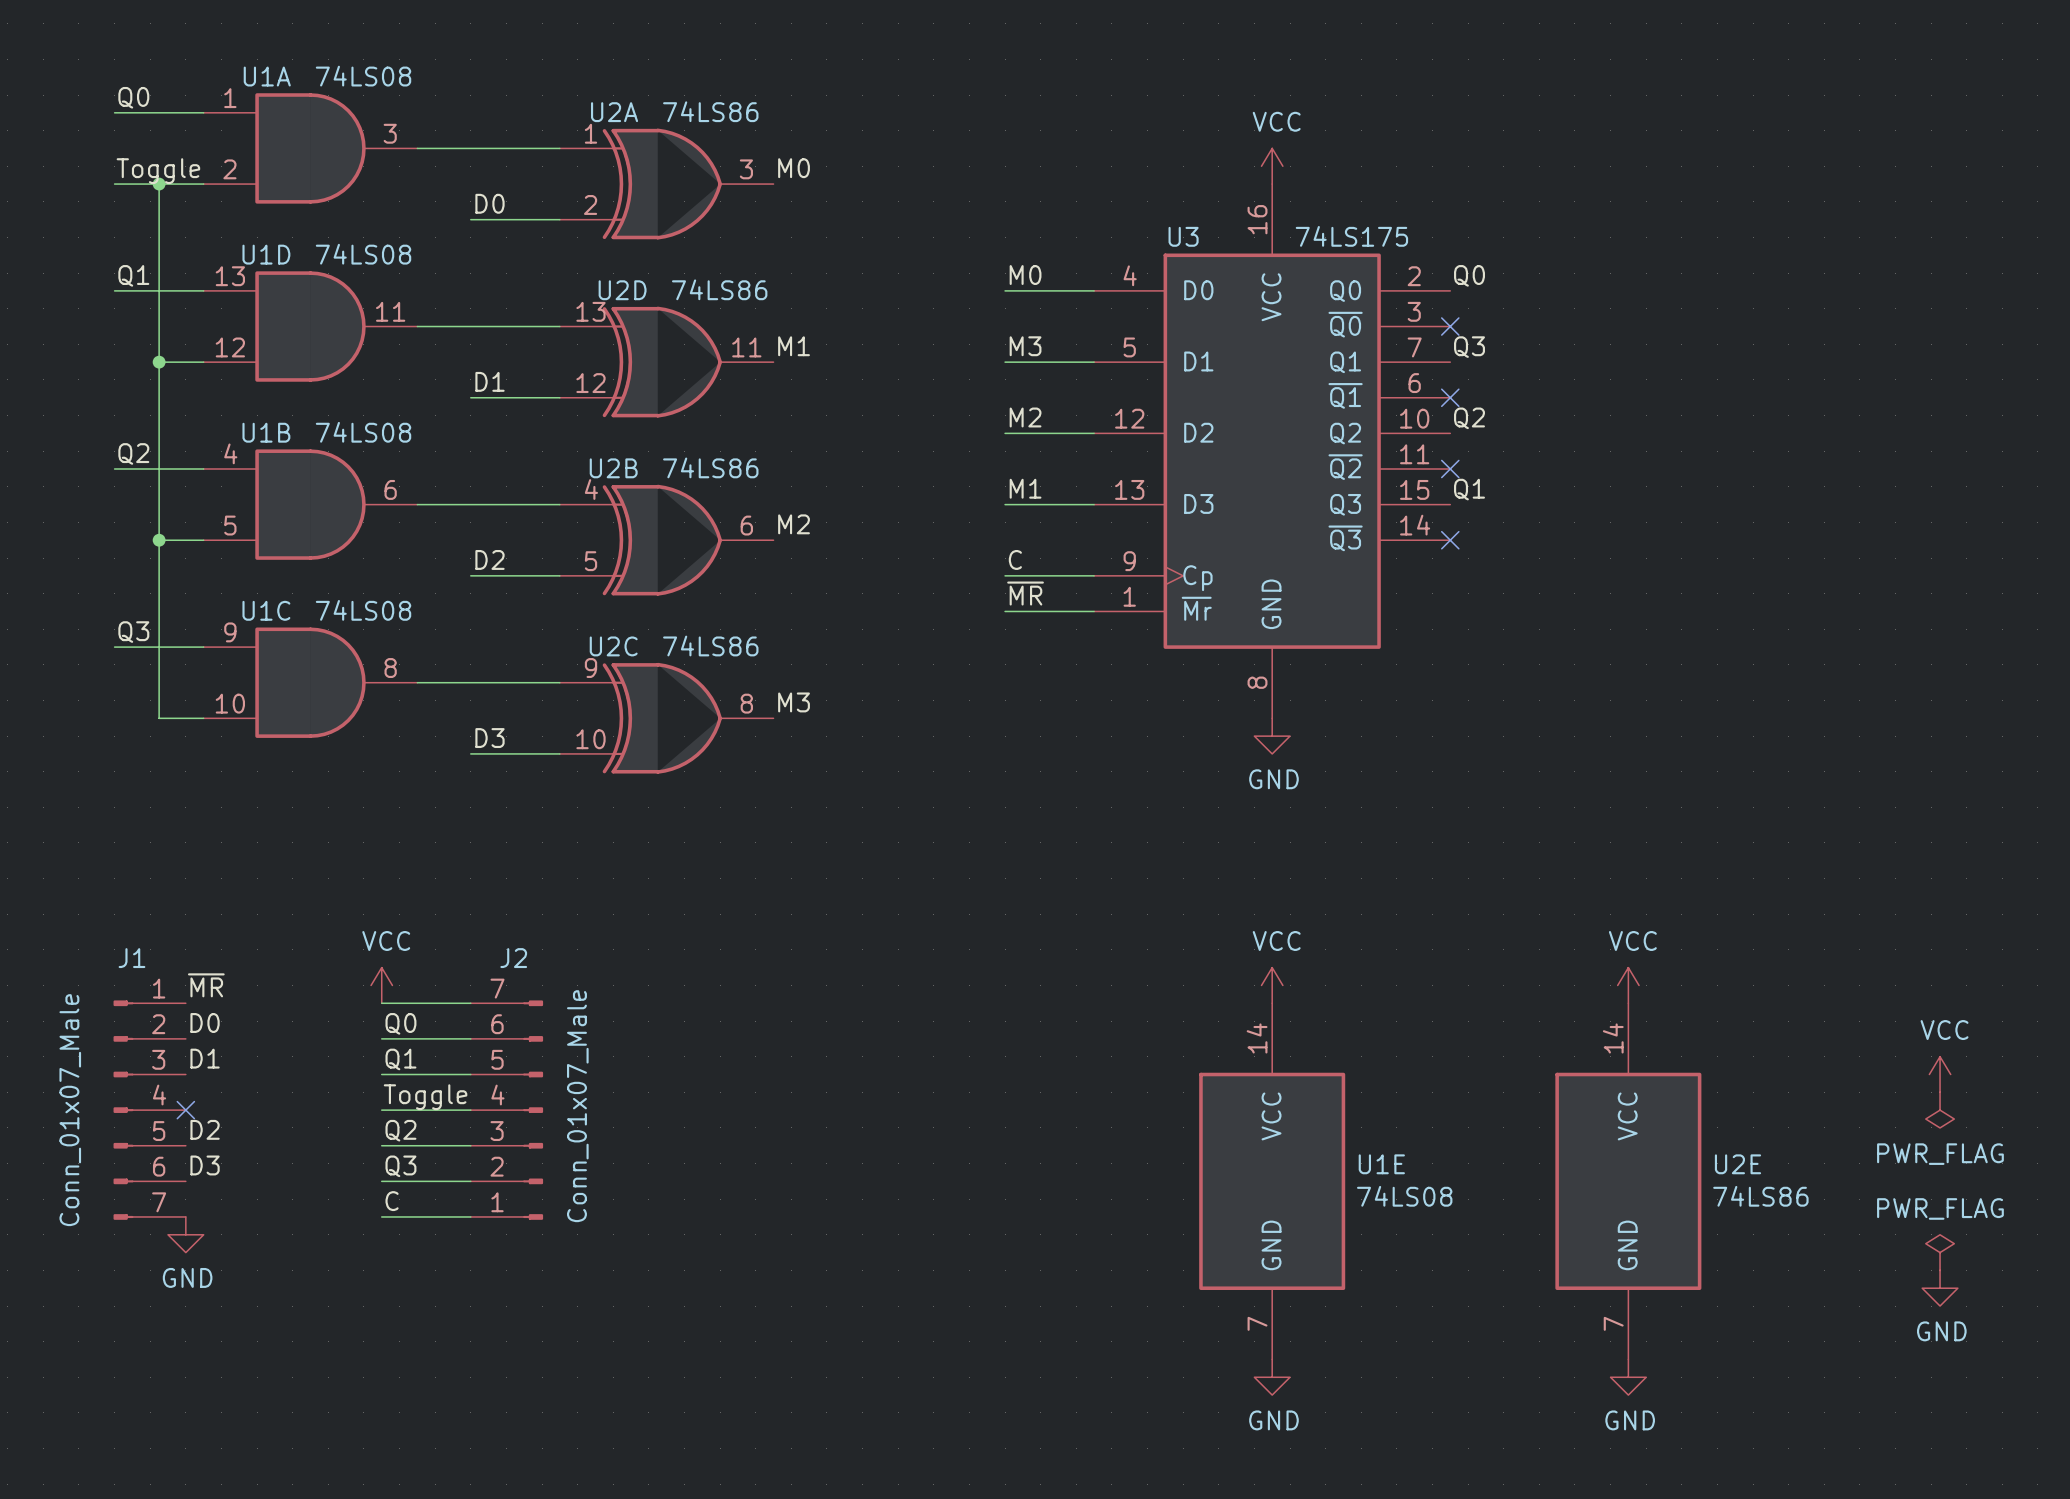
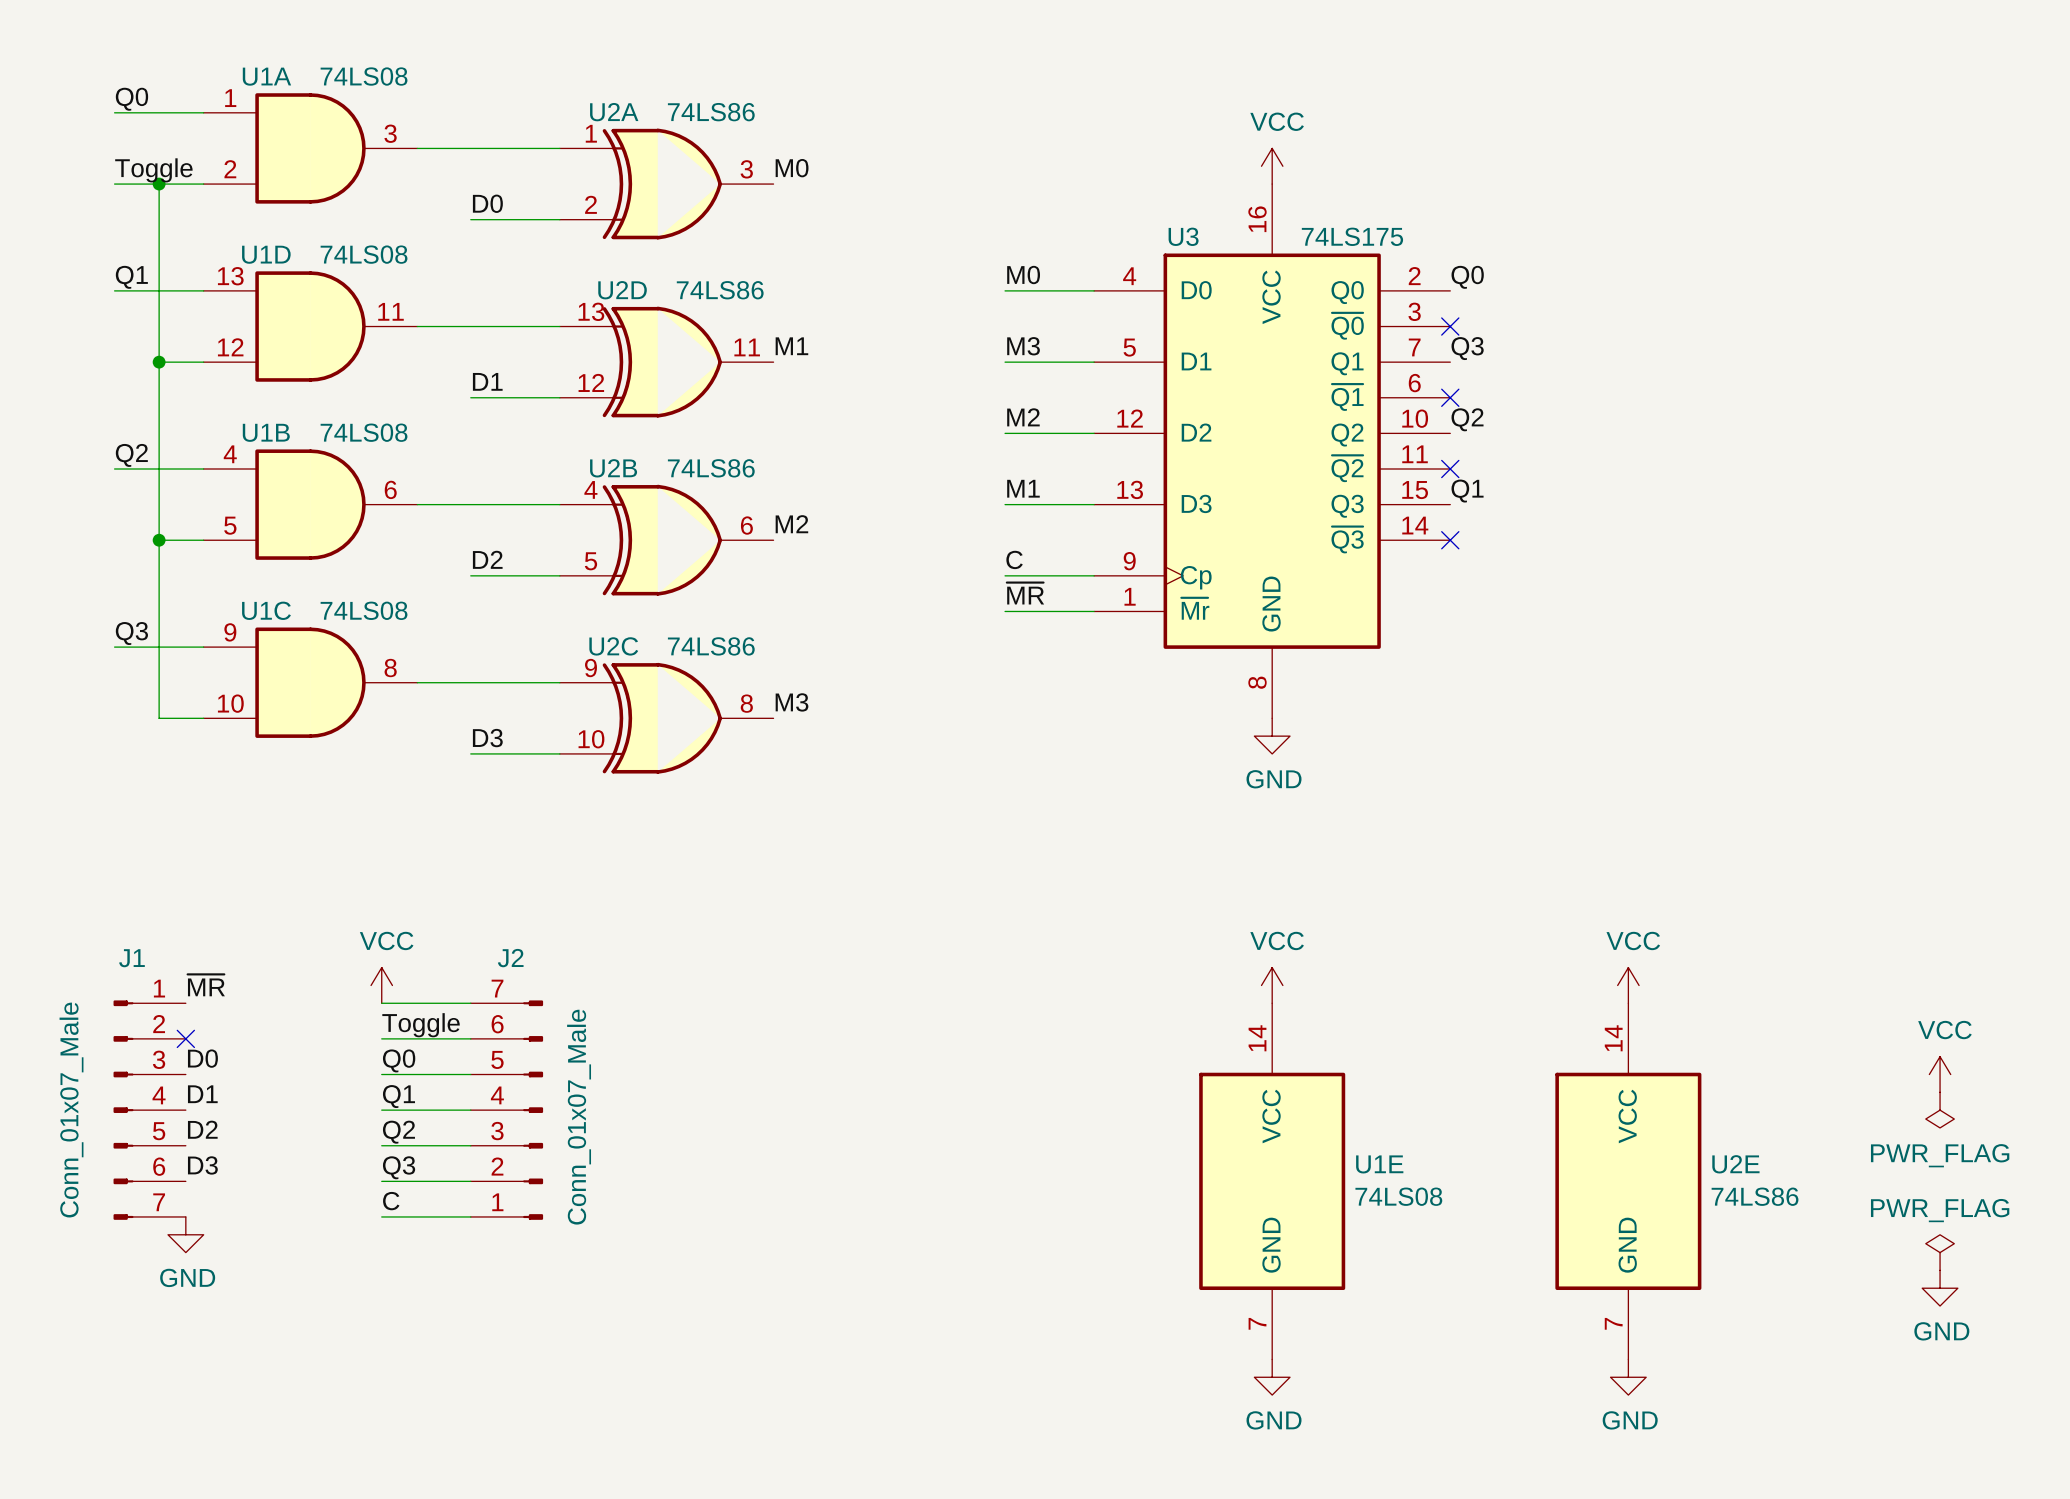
label: D0 (205, 1023) -> none
label: Q0 (400, 1023) -> Toggle (421, 1025)
label: D1 (205, 1058) -> D0 (202, 1058)
label: Q1 (400, 1059) -> Q0 (399, 1060)
label: none -> D1 (202, 1094)
label: Toggle (425, 1097) -> Q1 (398, 1096)
no-connect mark position: (185, 1110) -> (185, 1038)

